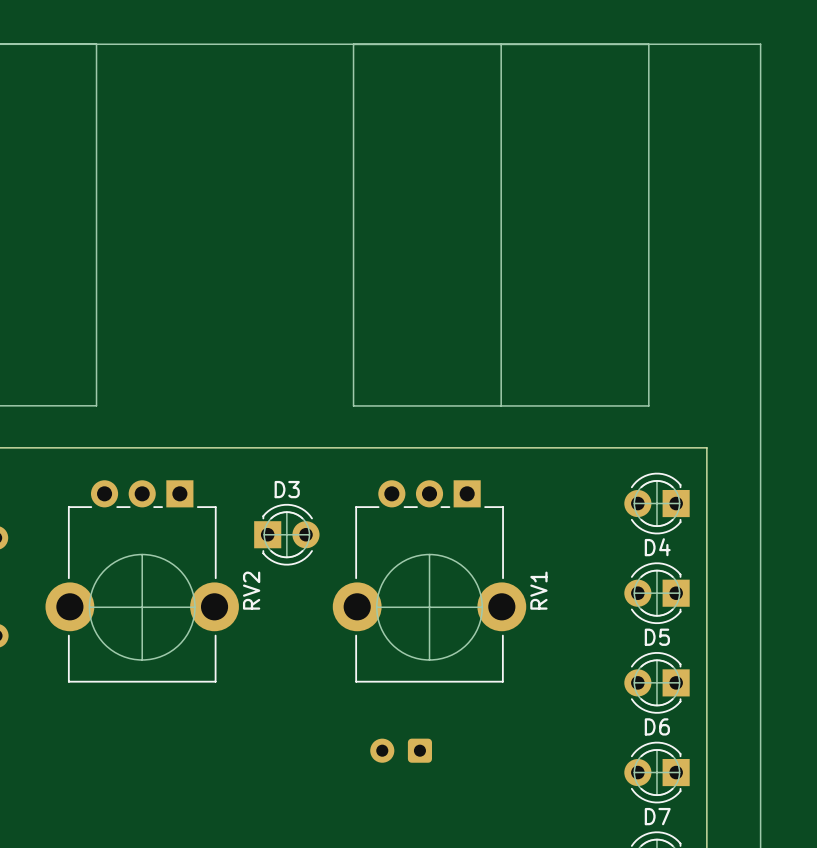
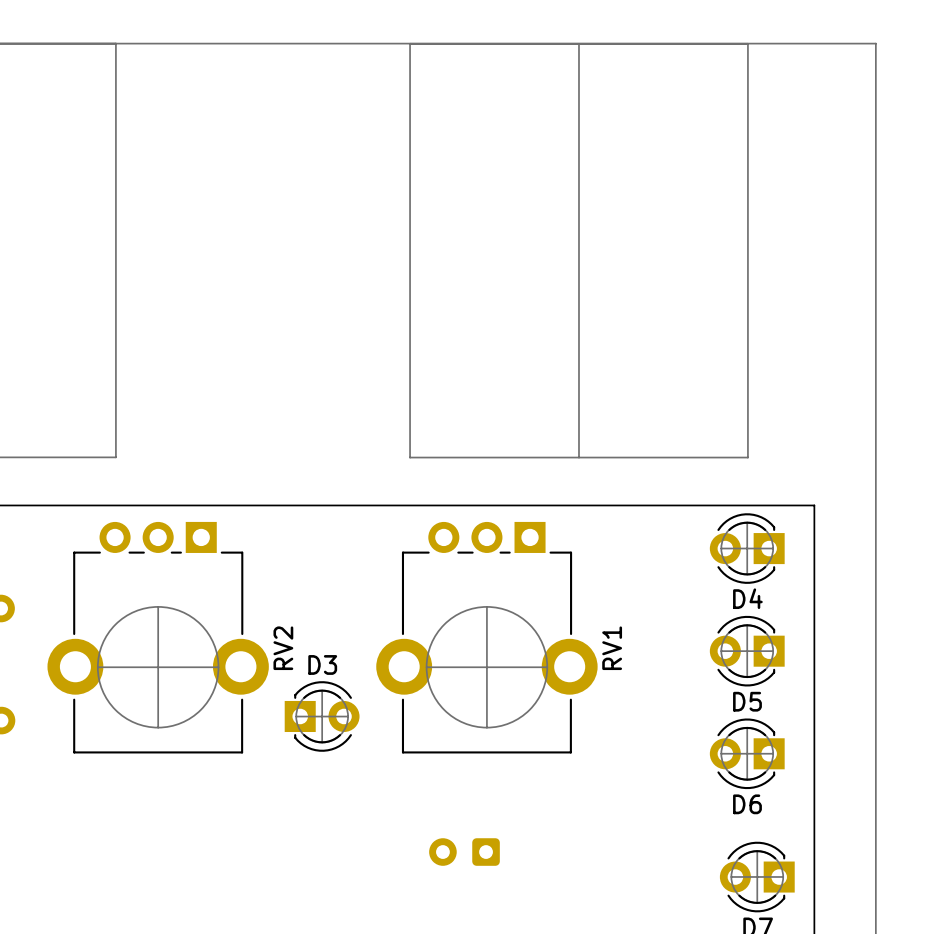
D4 position: (657, 503) -> (747, 548)
D3 position: (286, 534) -> (322, 716)
RV2 position: (142, 581) -> (158, 637)
RV1 position: (429, 581) -> (486, 637)
D5 position: (657, 593) -> (747, 651)
D6 position: (657, 682) -> (747, 753)

